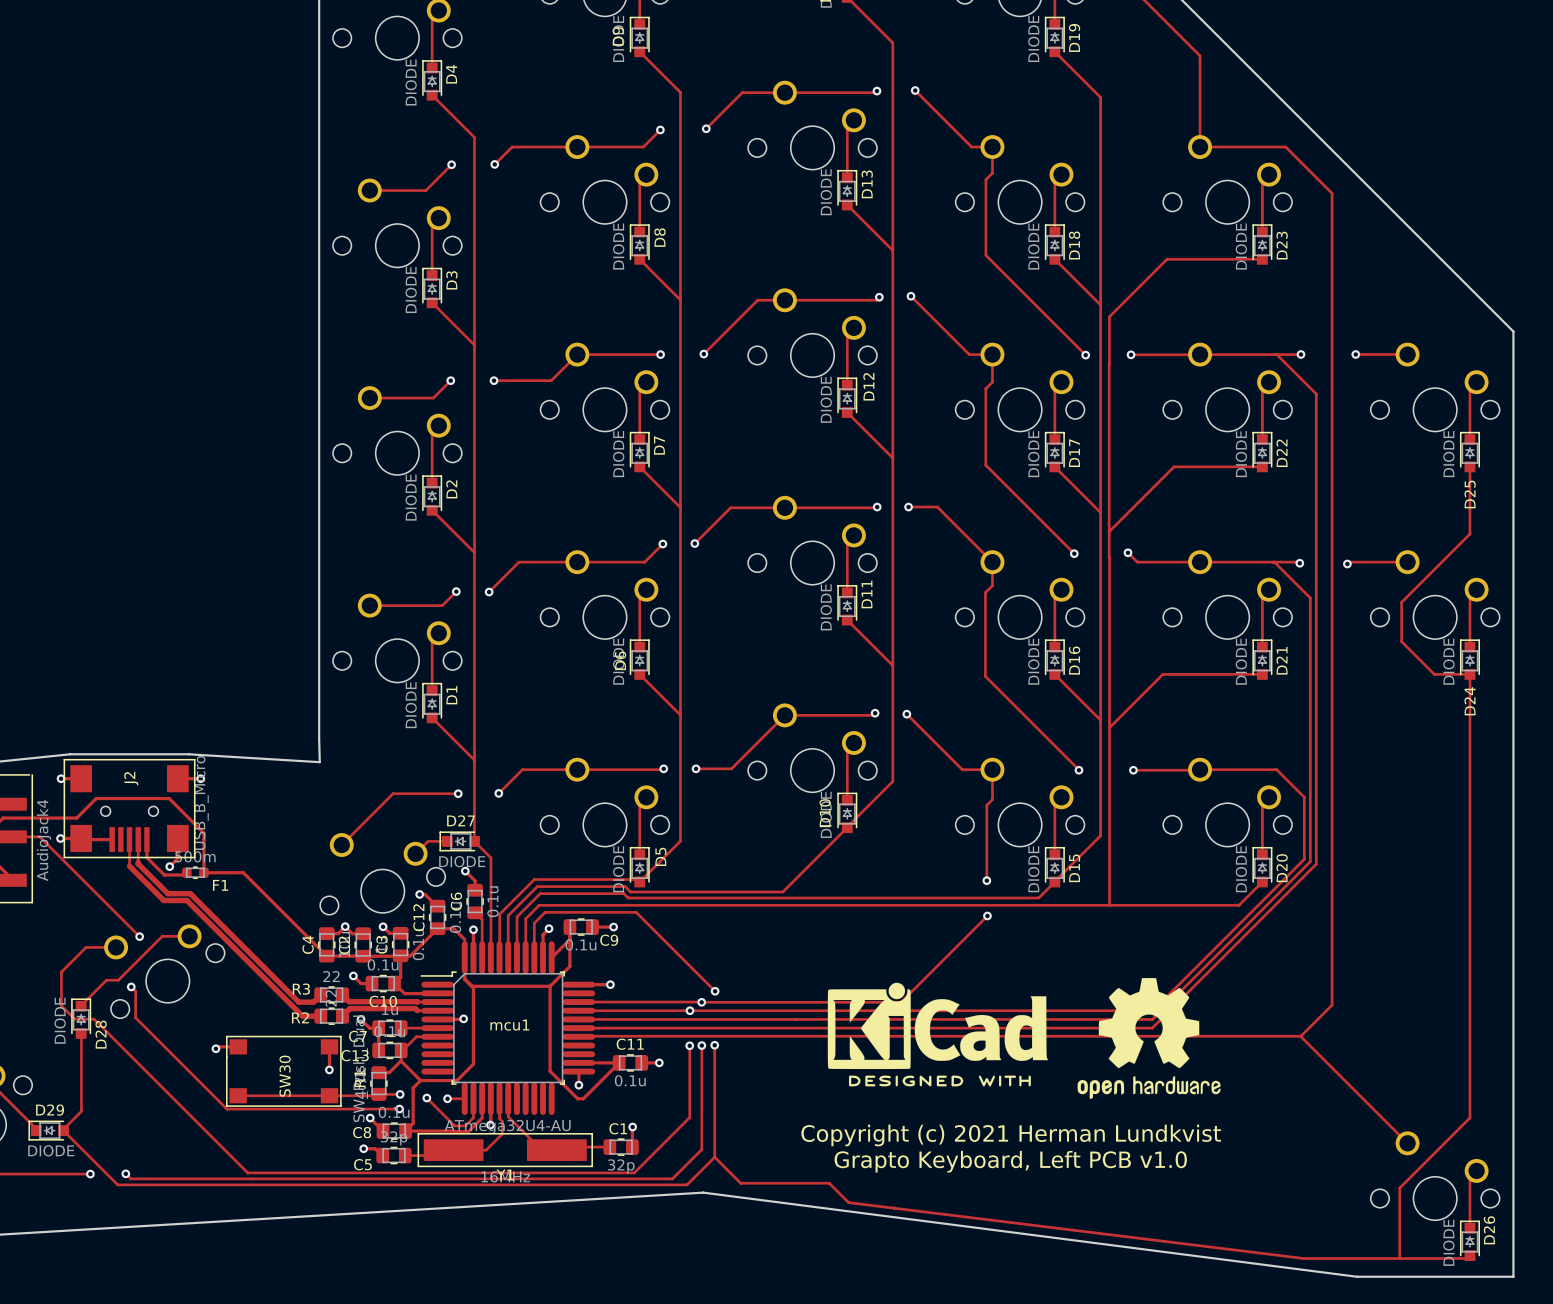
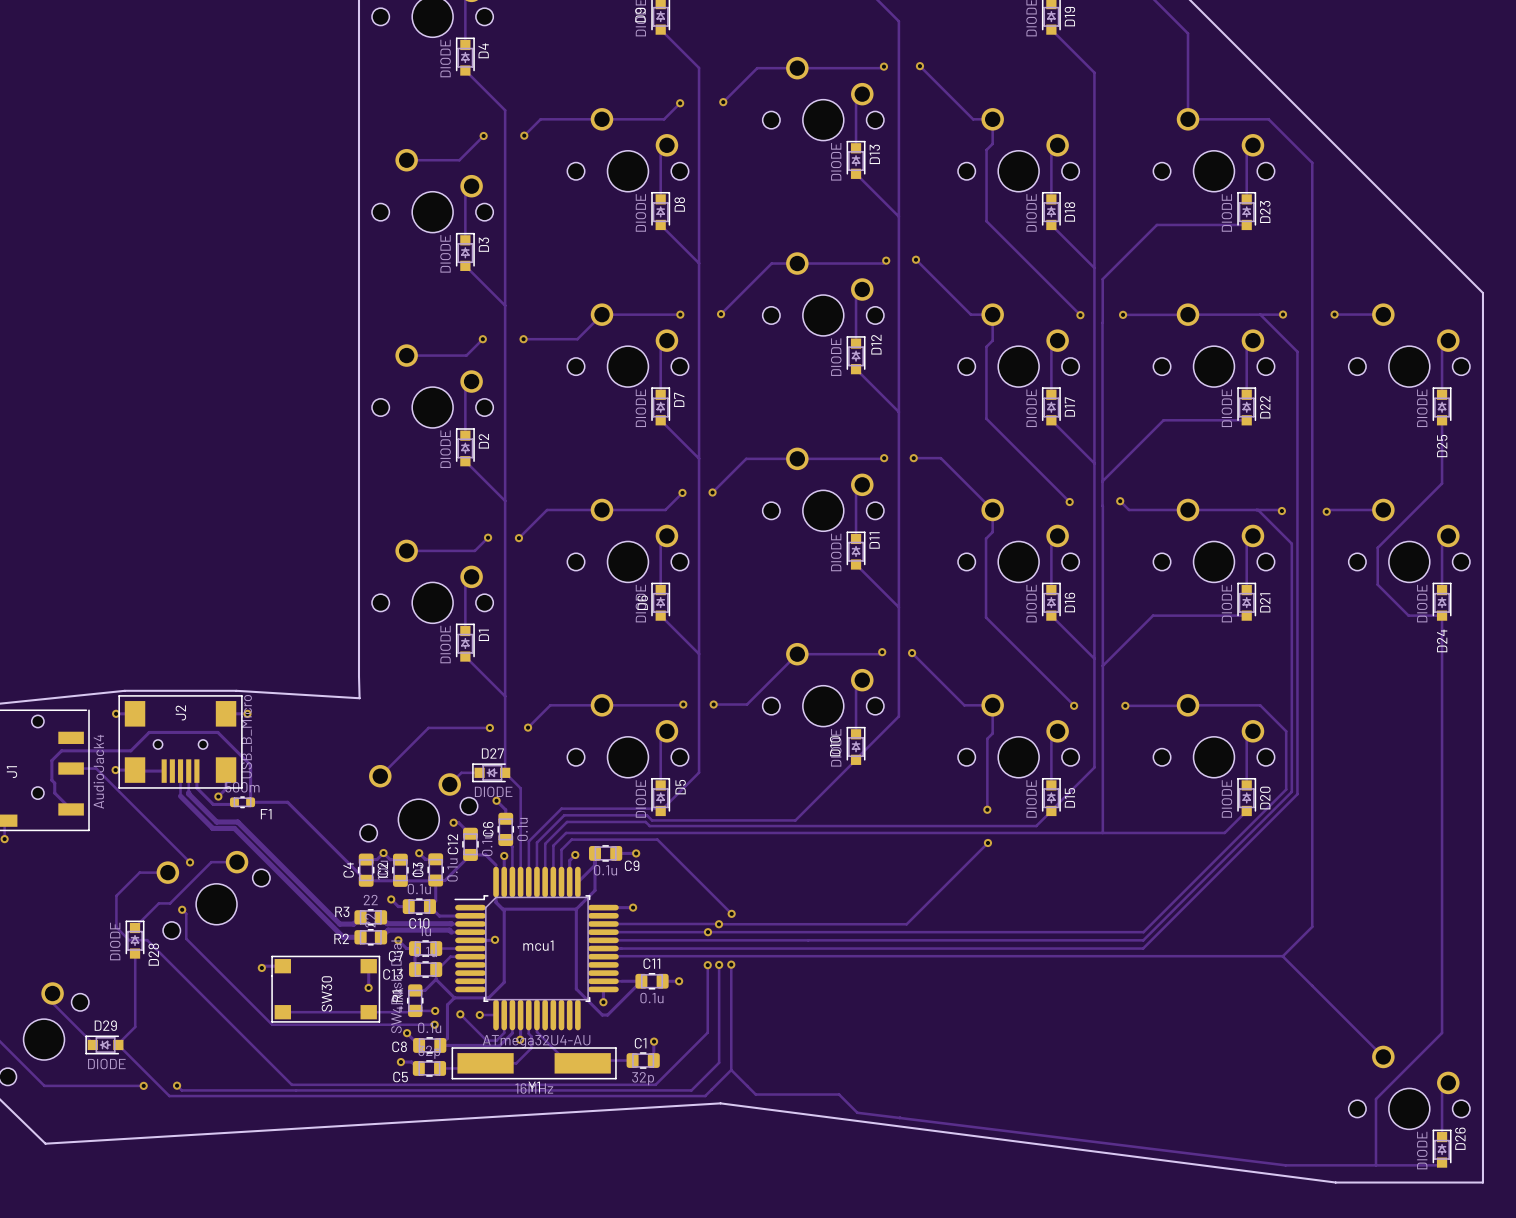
drawing: [1077, 978, 1221, 1099] -> none
drawing: [827, 982, 1049, 1087] -> none
text: Copyright (c) 2021 Herman Lundkvist (1011, 1135) -> none
text: Grapto Keyboard, Left PCB v1.0 (1010, 1161) -> none

